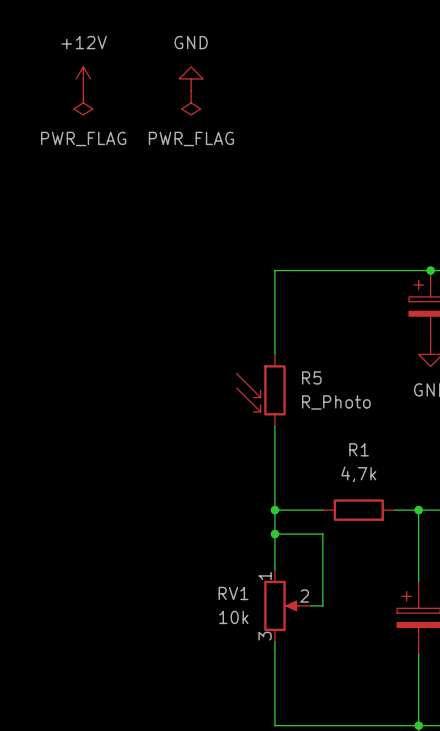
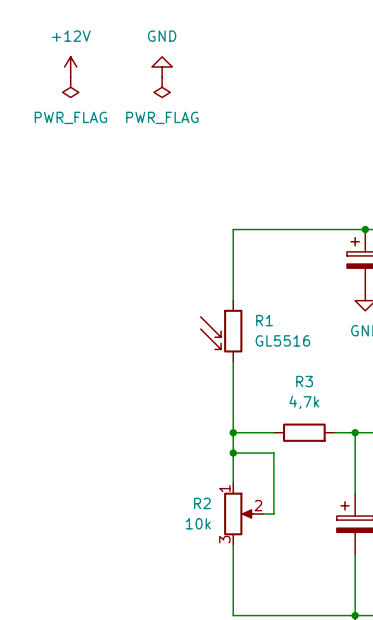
R5 name: R5 (311, 377) -> R1 (264, 320)
R5 value: R_Photo (336, 402) -> GL5516 (282, 340)
R1 name: R1 (359, 449) -> R3 (304, 381)
RV1 name: RV1 (233, 593) -> R2 (202, 503)

